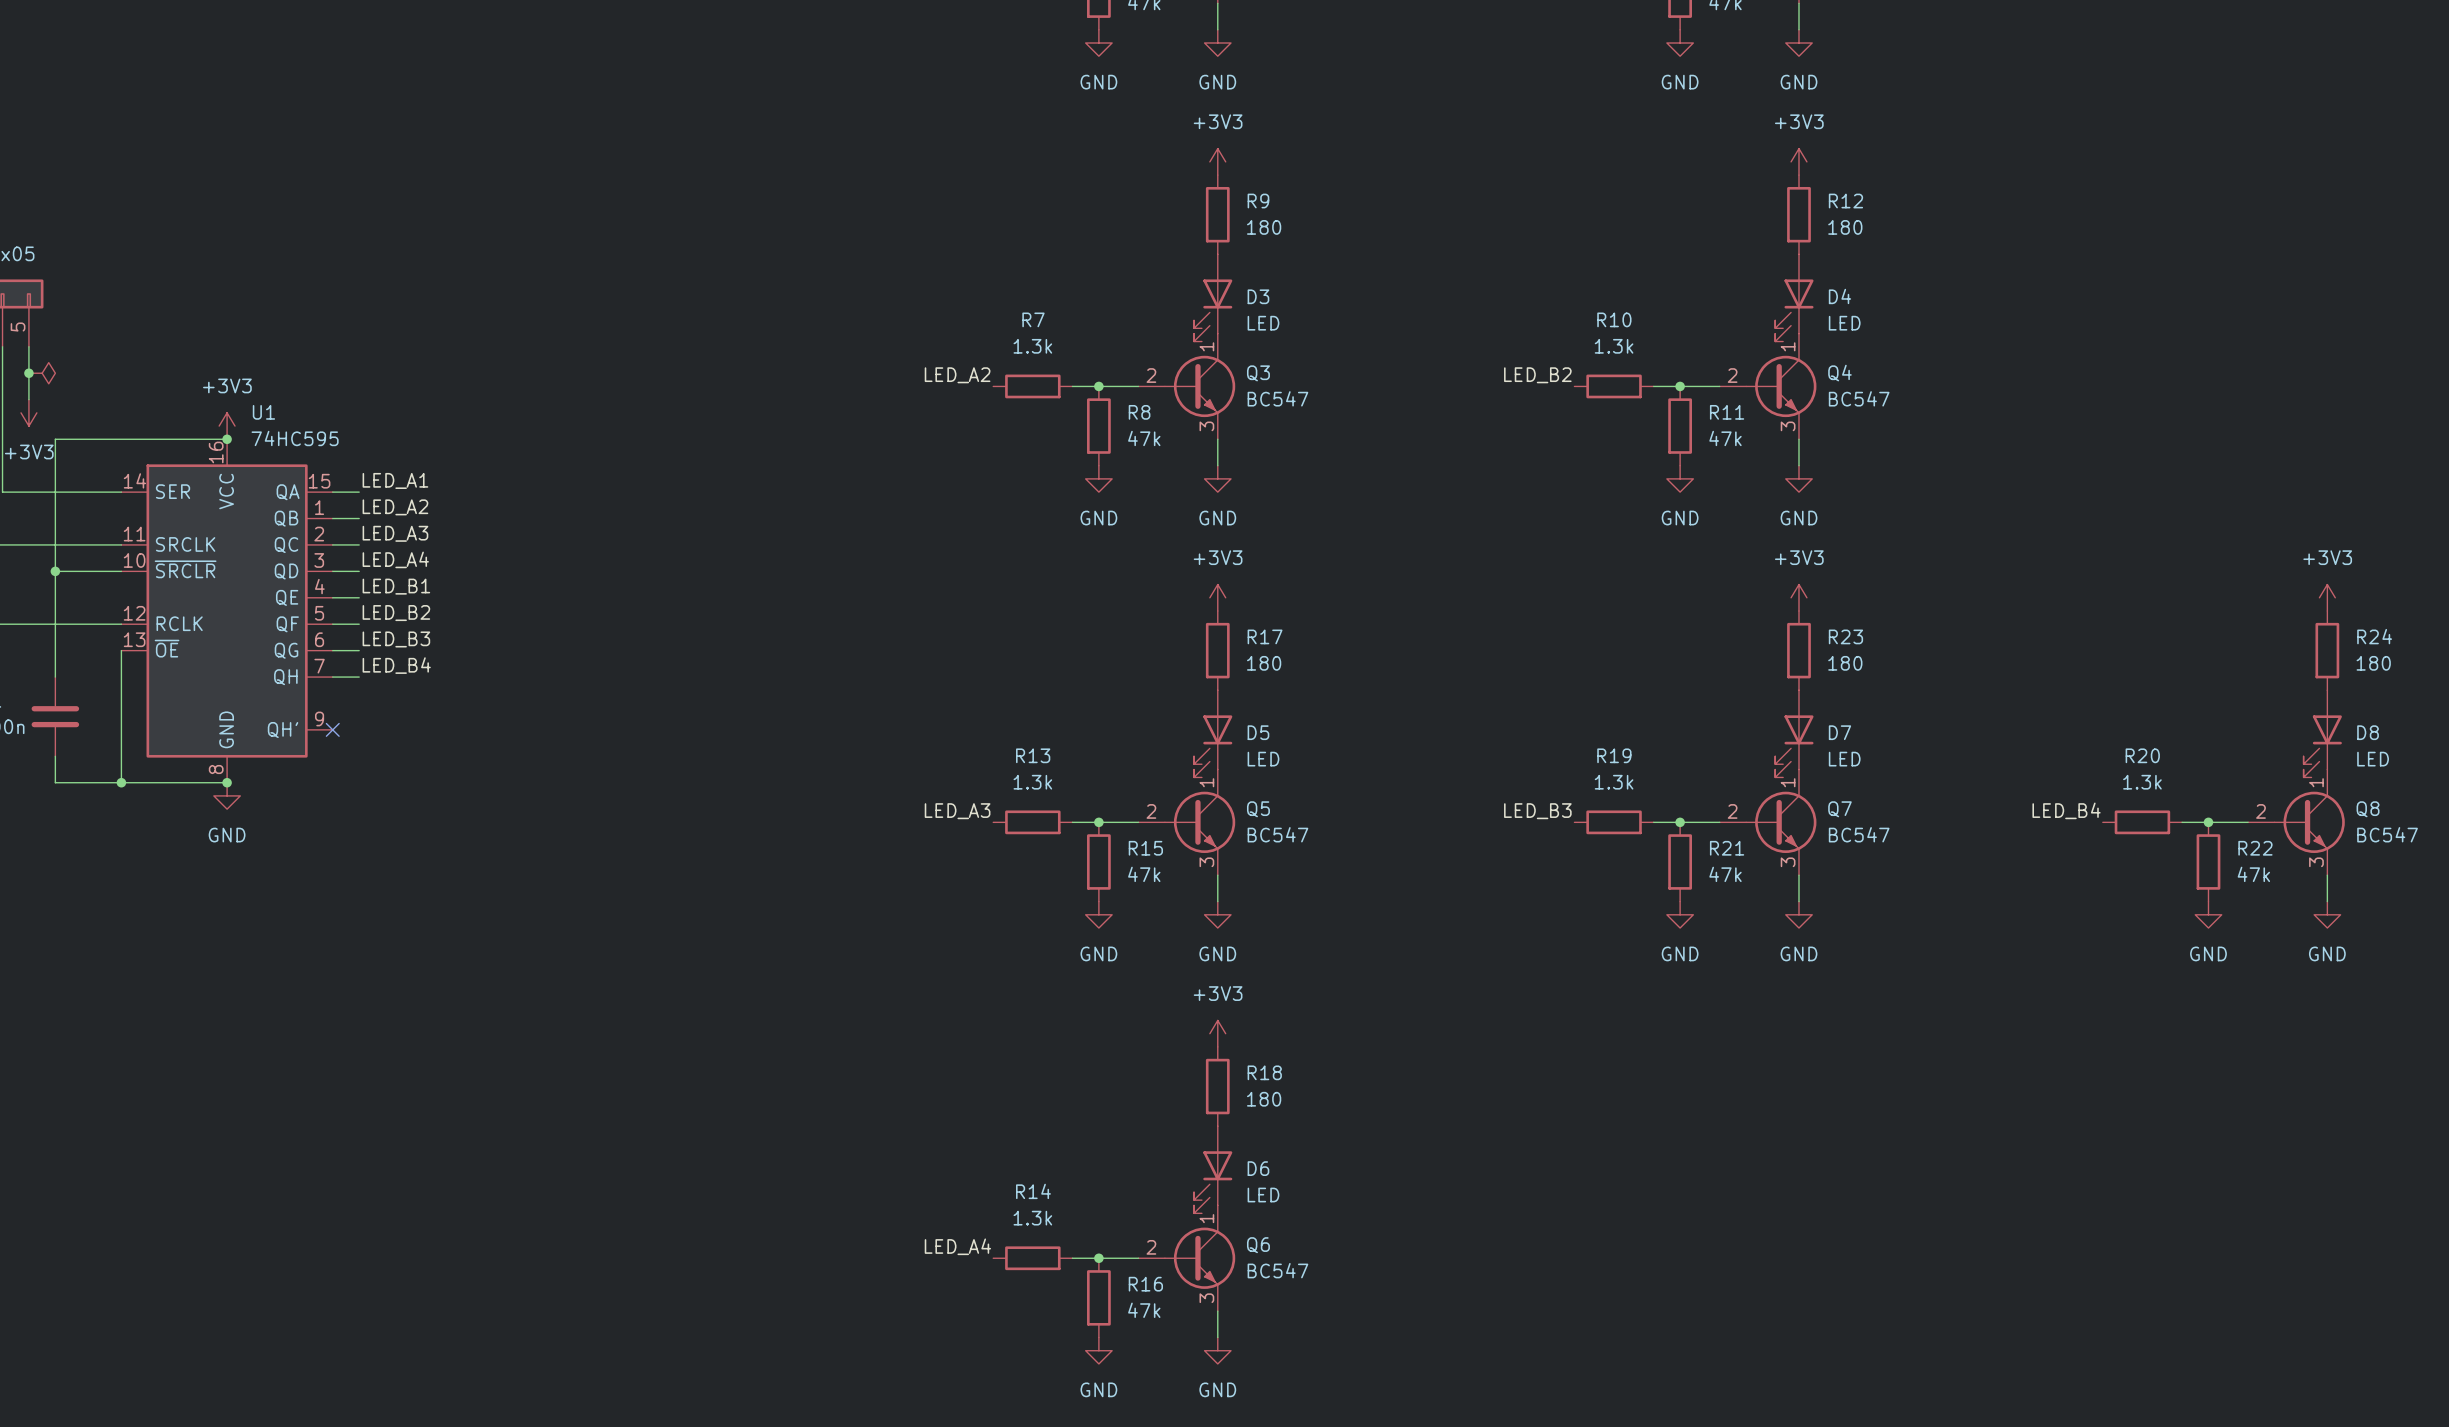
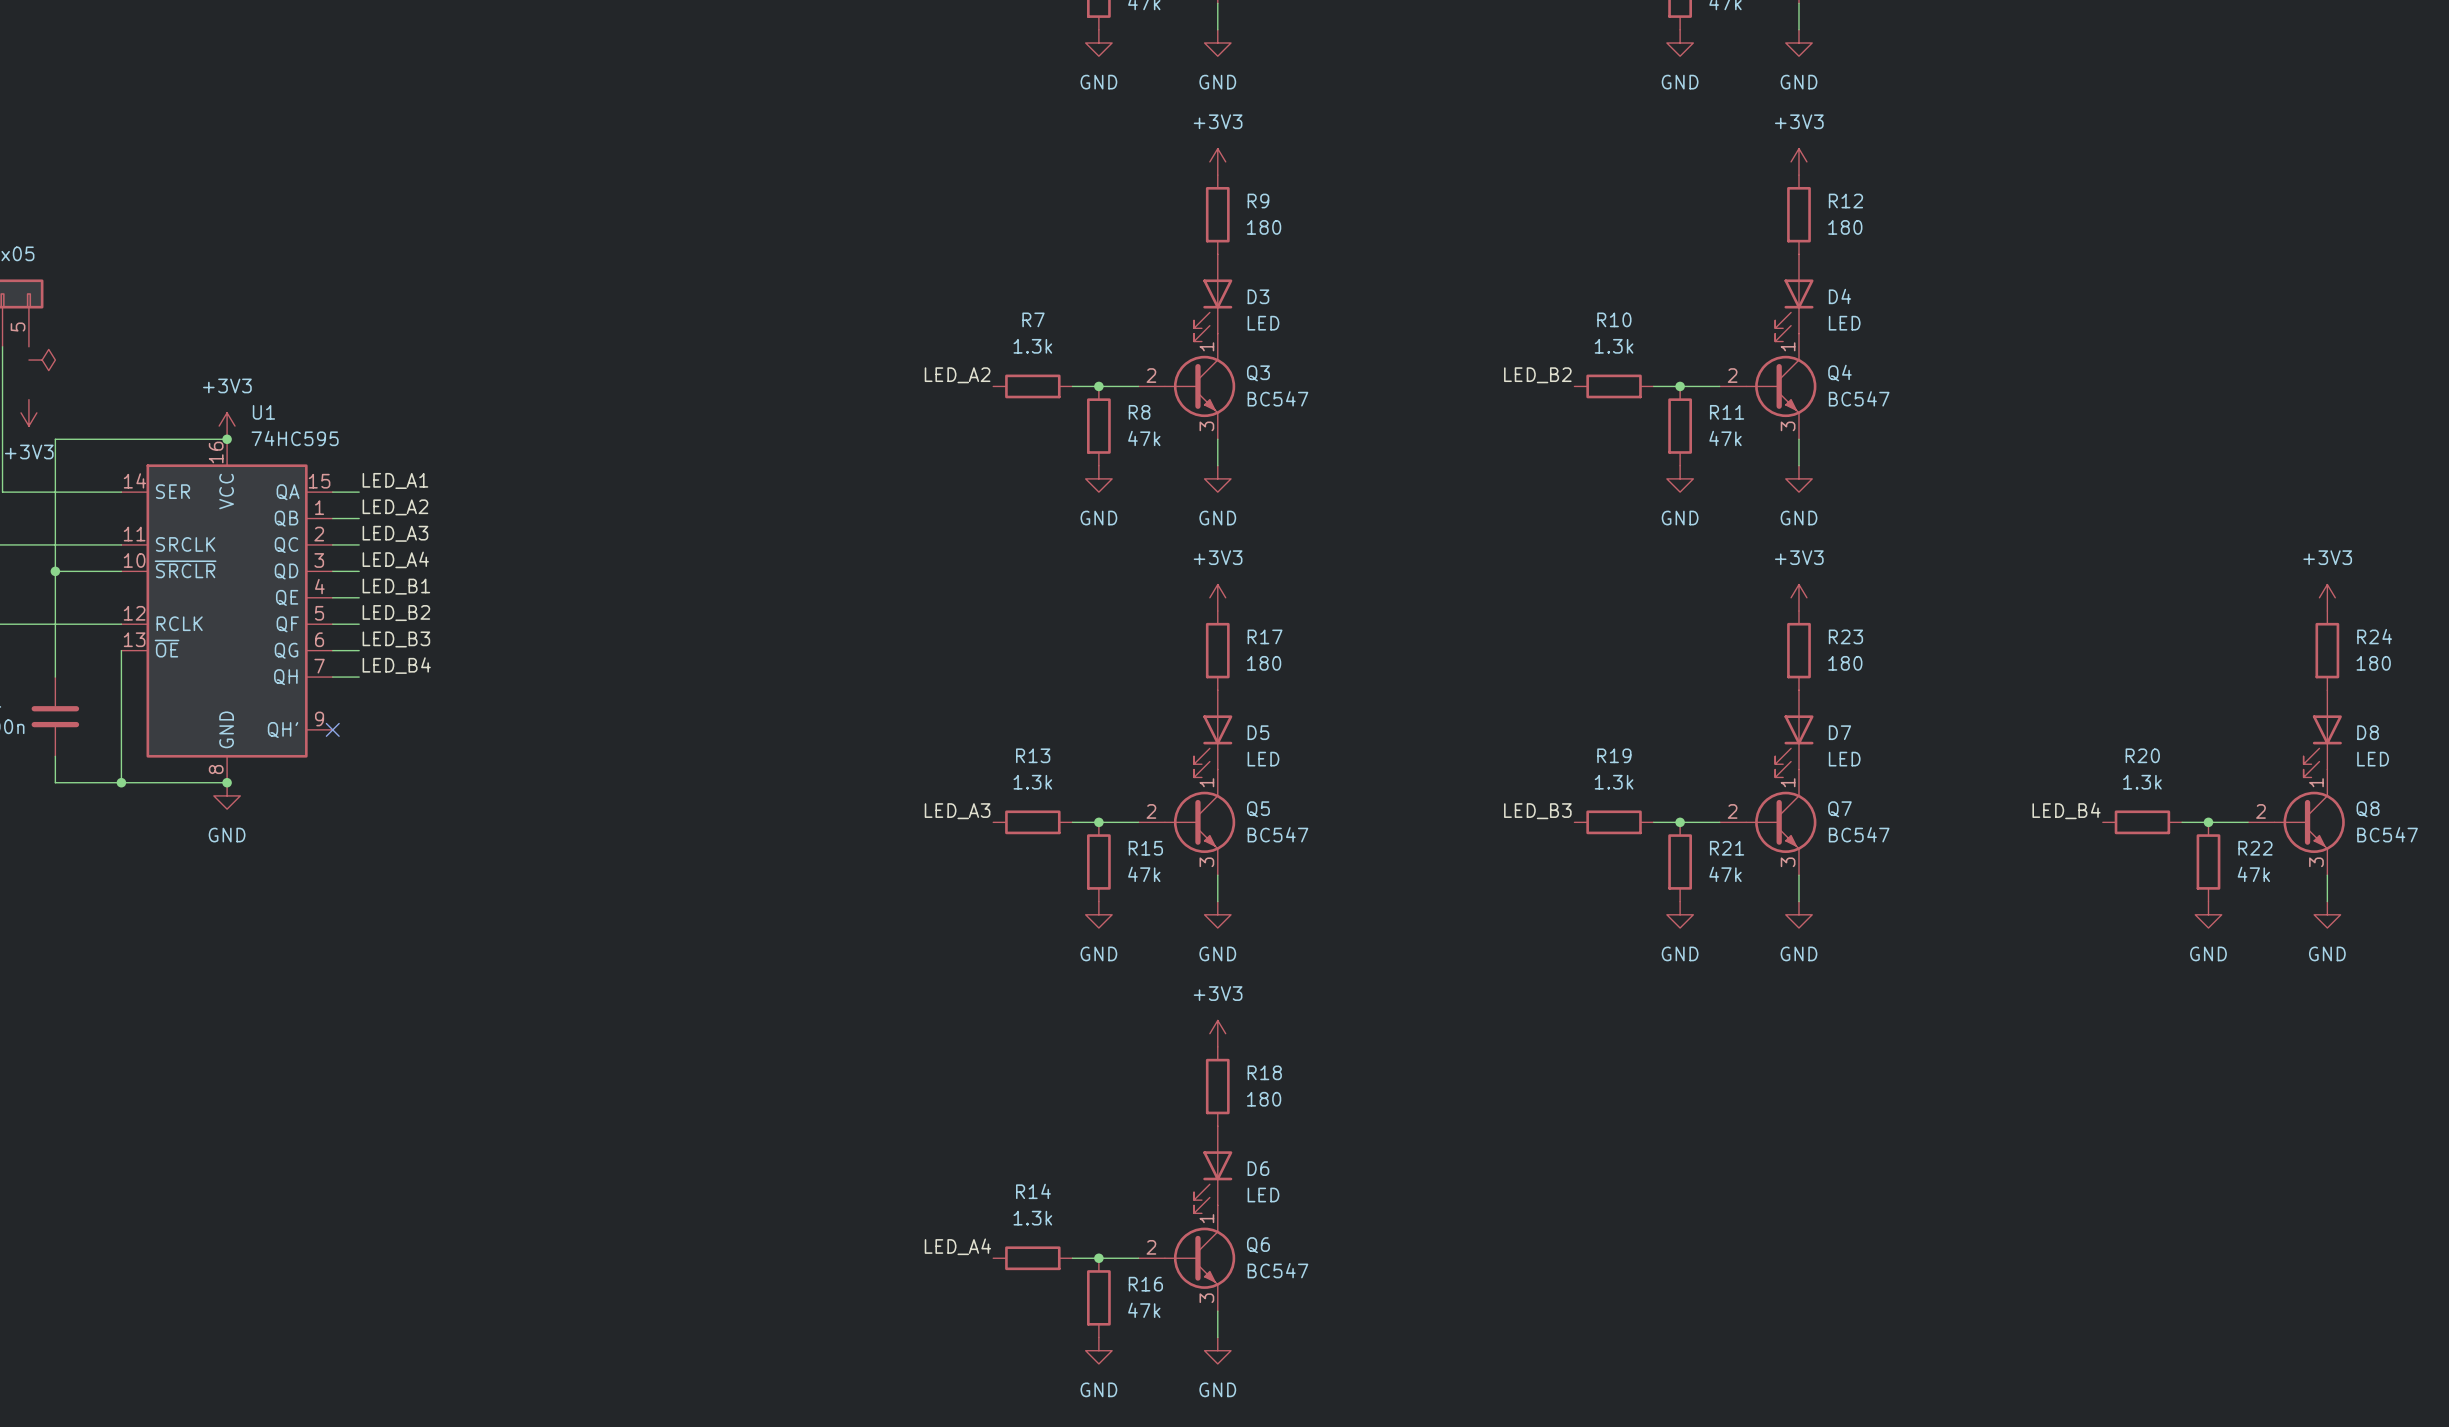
wire: (28, 346) (28, 399) -> none
junction: (28, 373) -> none
power symbol position: (42, 373) -> (42, 360)

